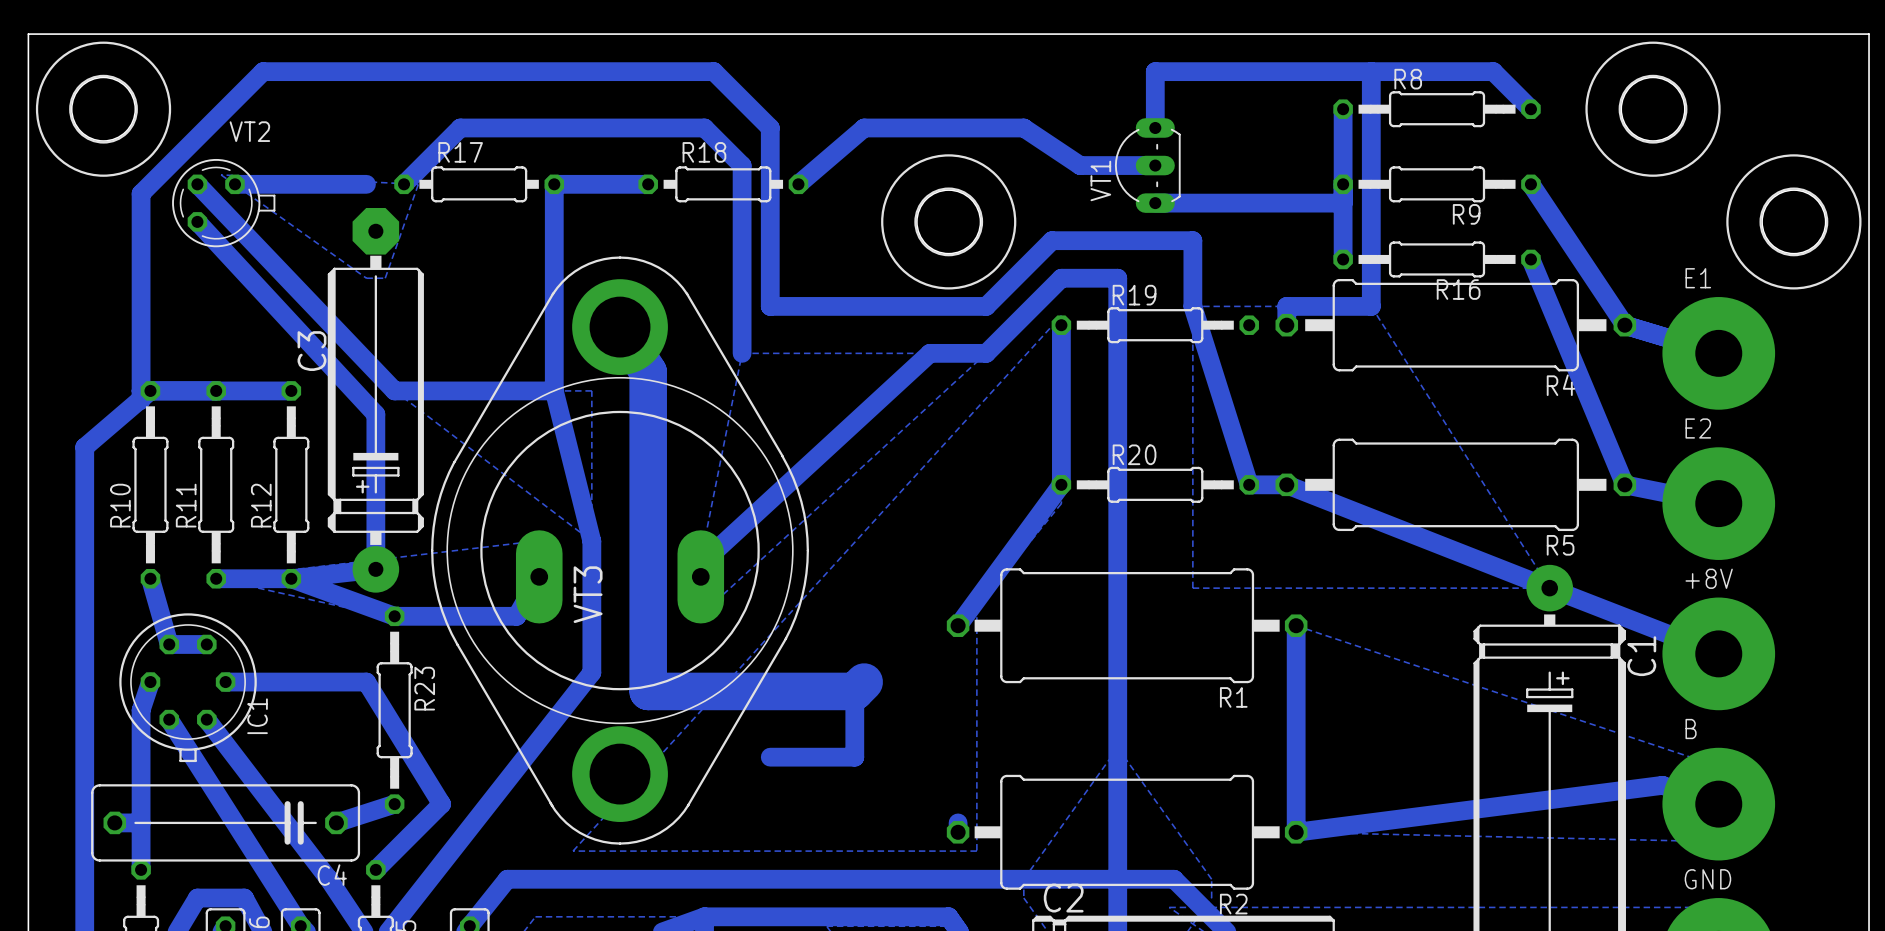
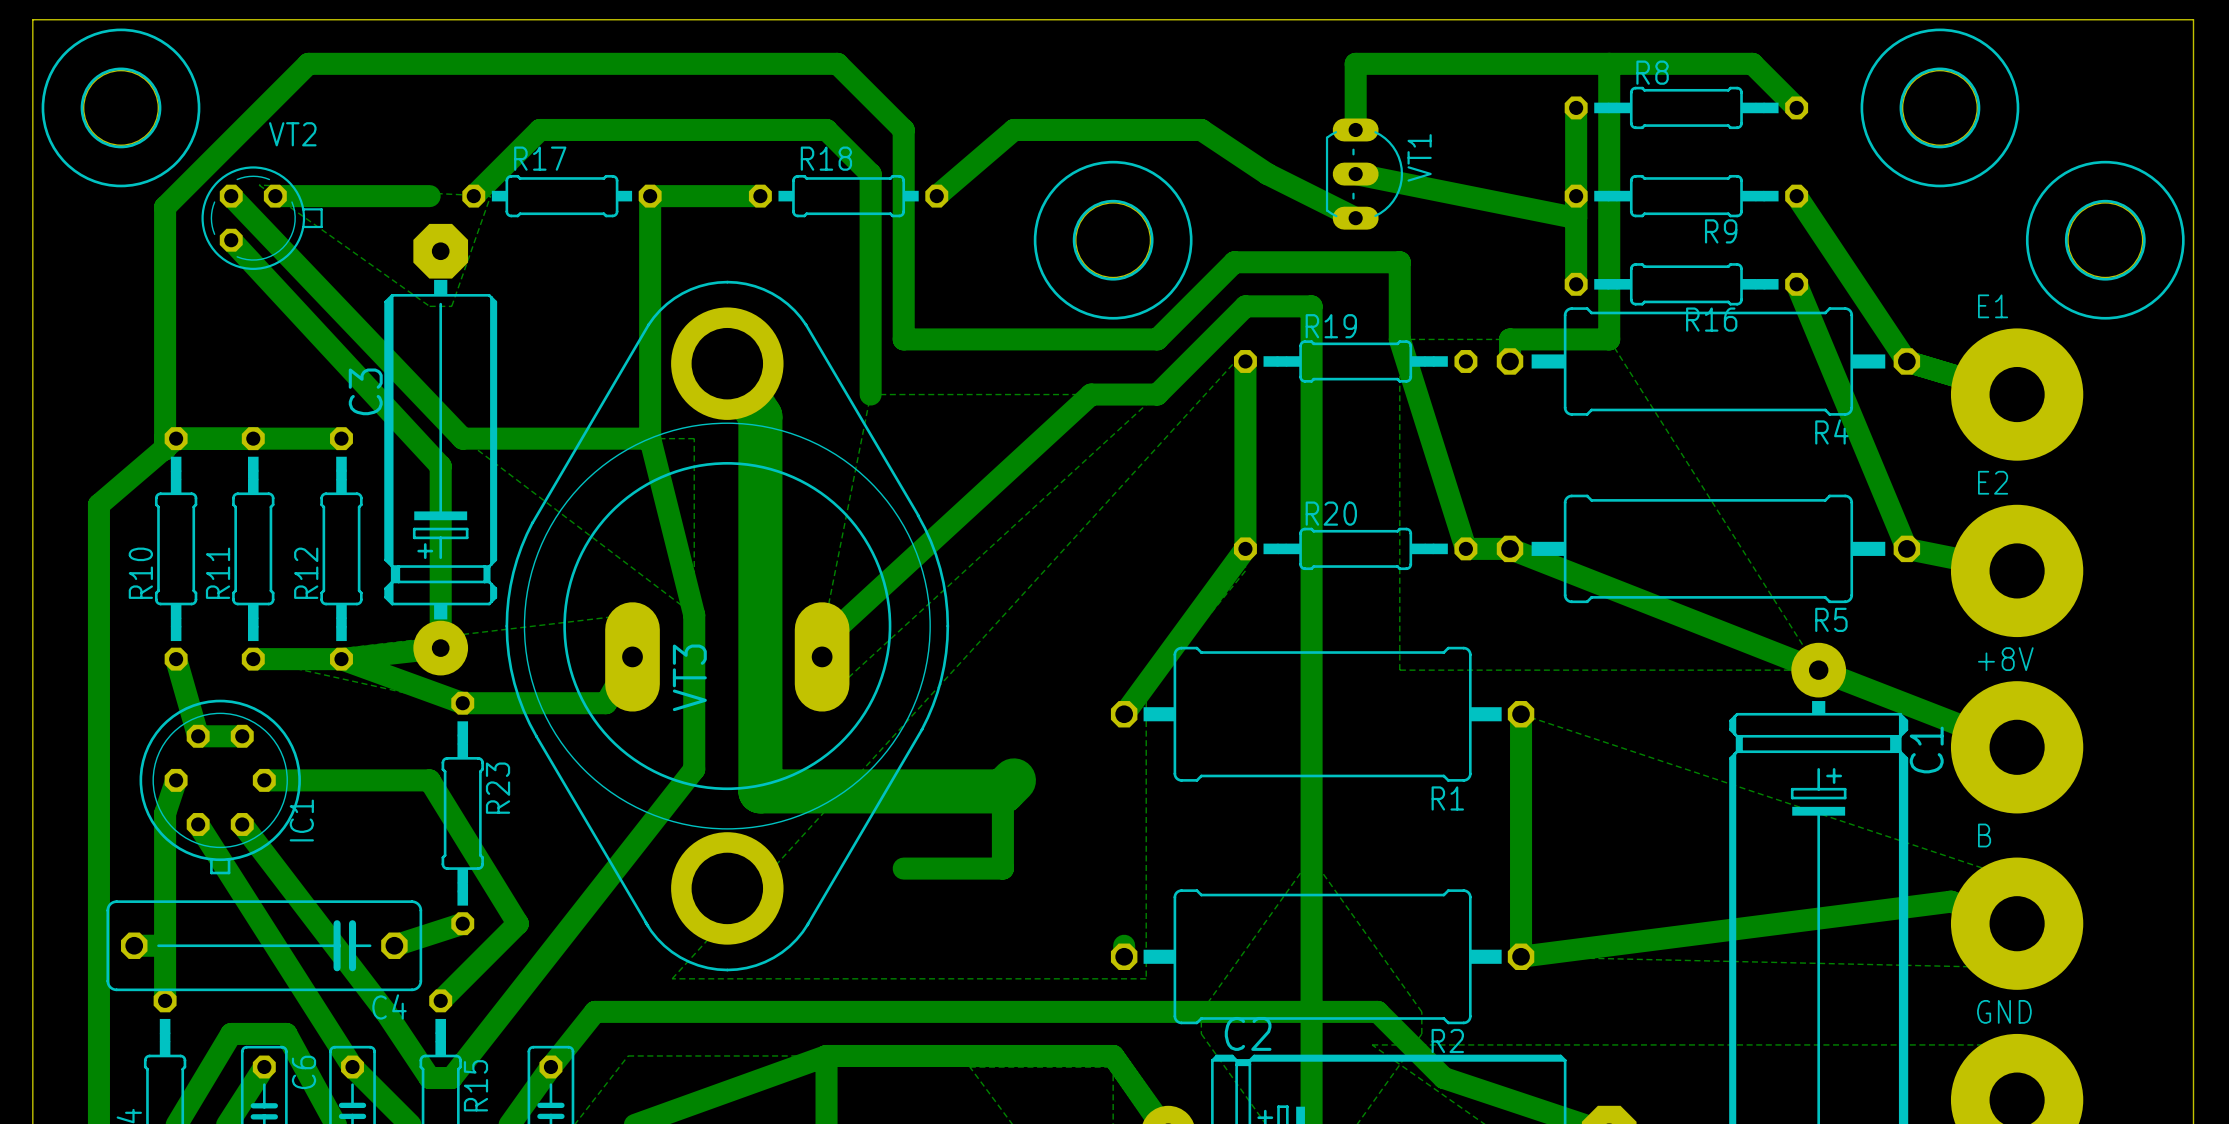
bottom track: (1080, 165) (1155, 165) -> (1267, 174) (1355, 218)
VT1 rotation: 0° (1147, 165) -> 180° (1364, 174)
bottom track: (1155, 203) (1343, 203) -> (1355, 174) (1576, 218)

